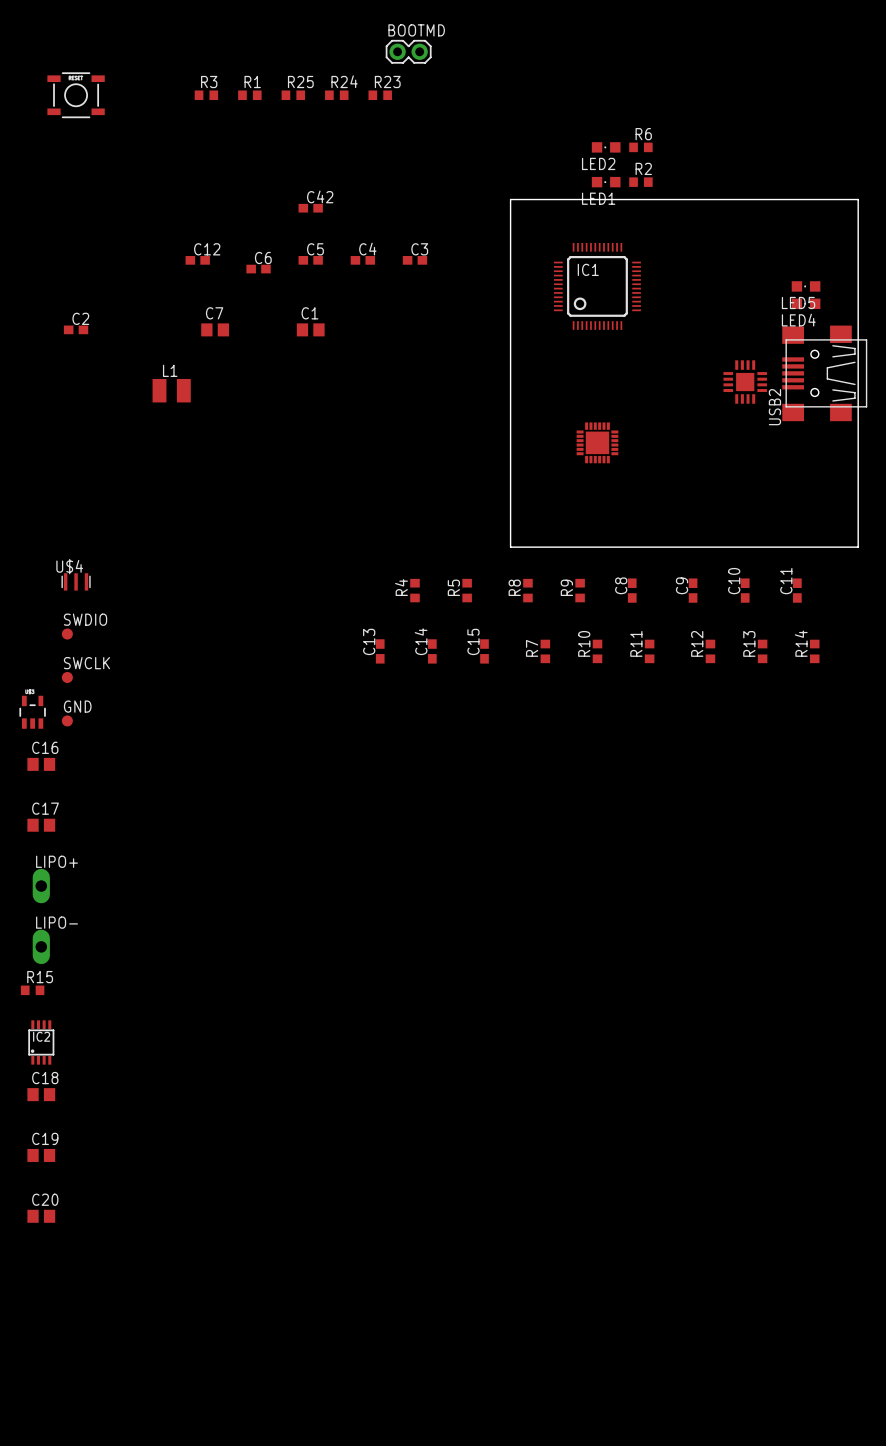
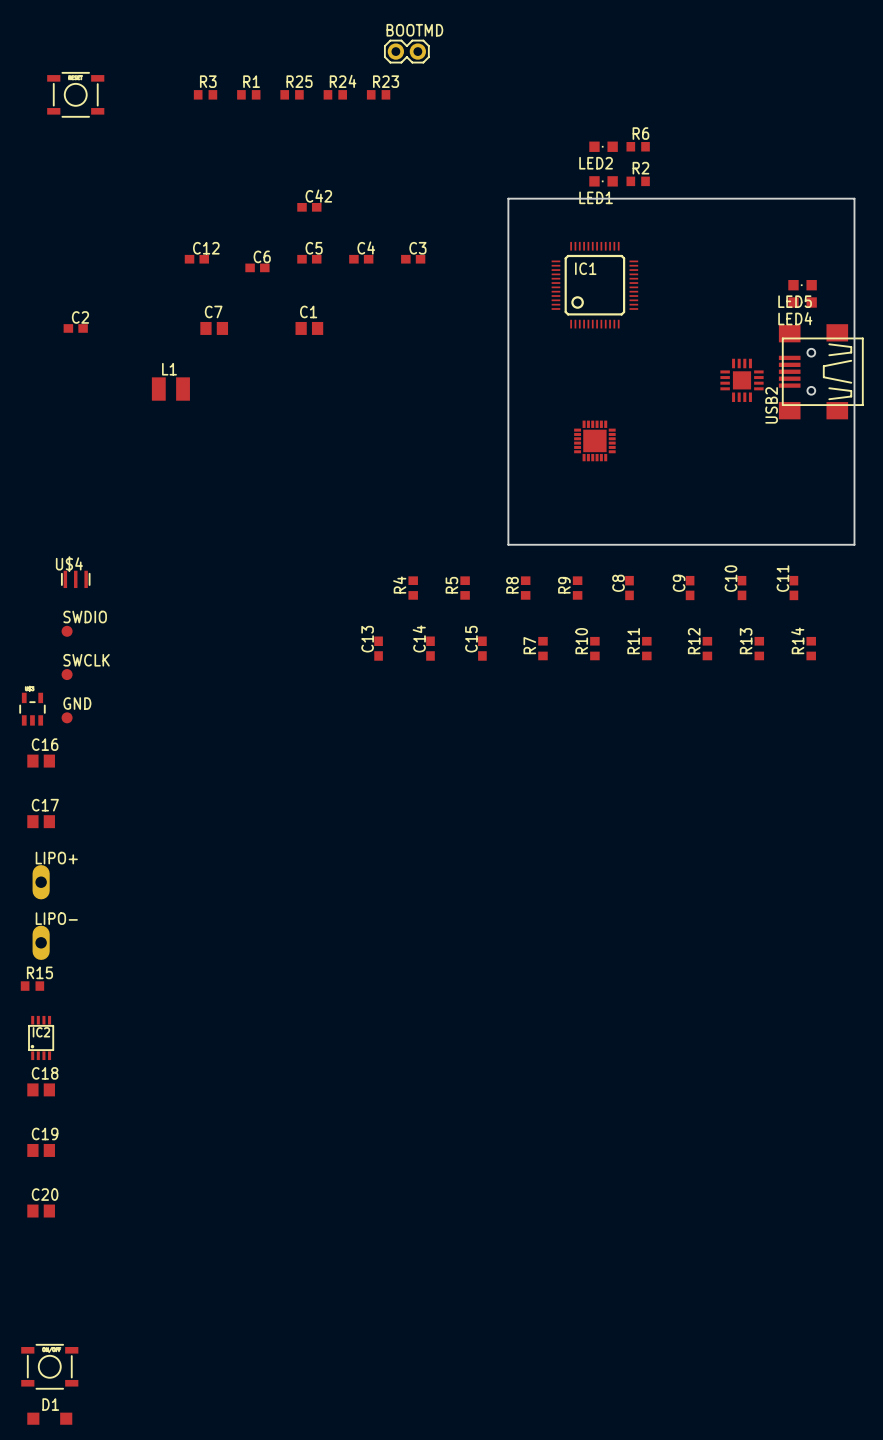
part: none -> (49, 1366)
D1: none -> (49, 1418)

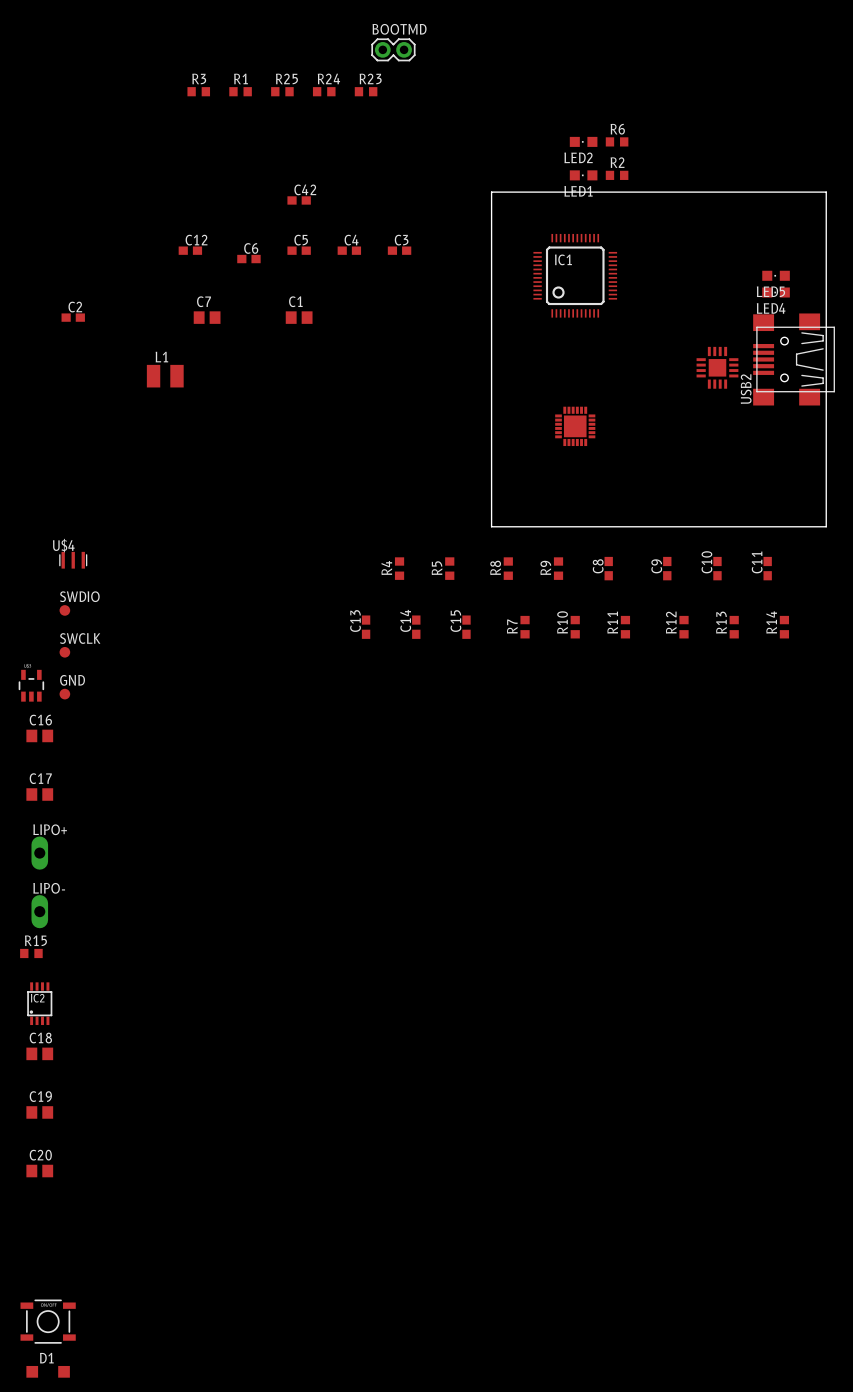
part: (75, 94) -> none

